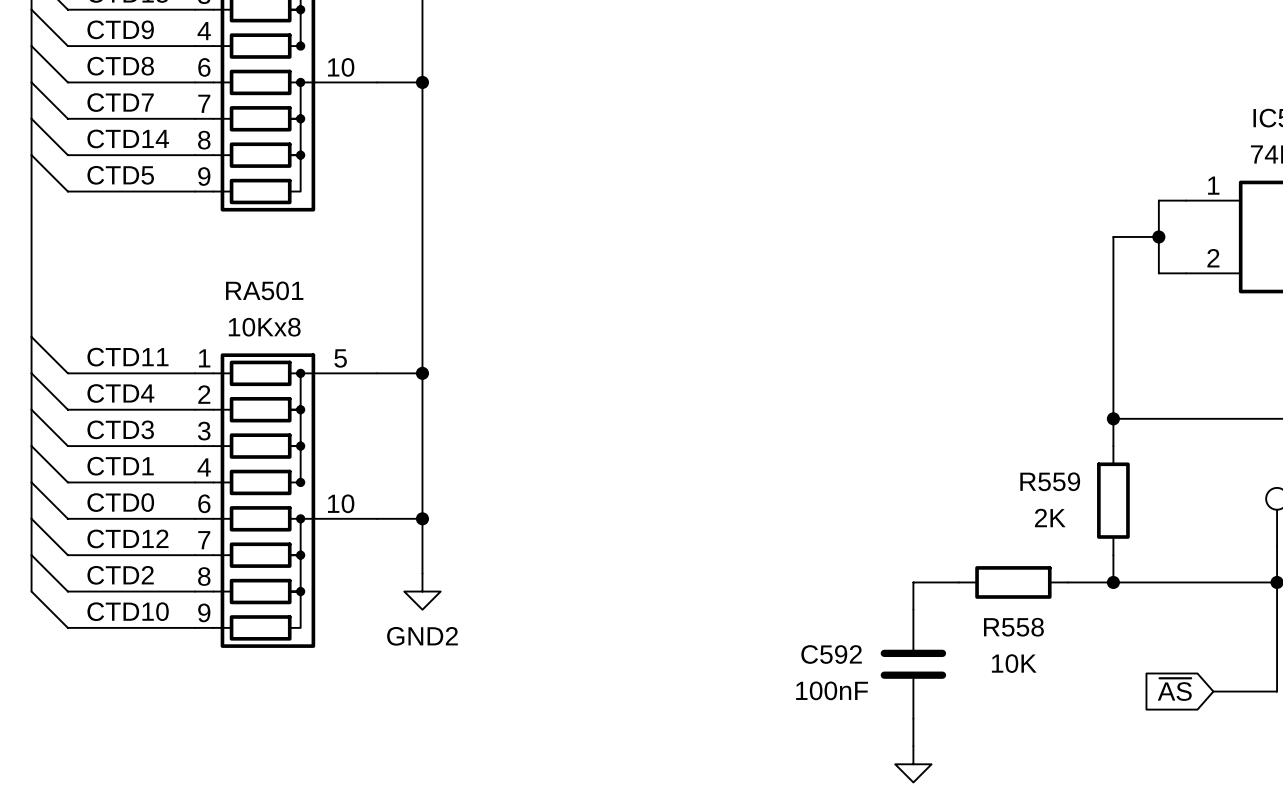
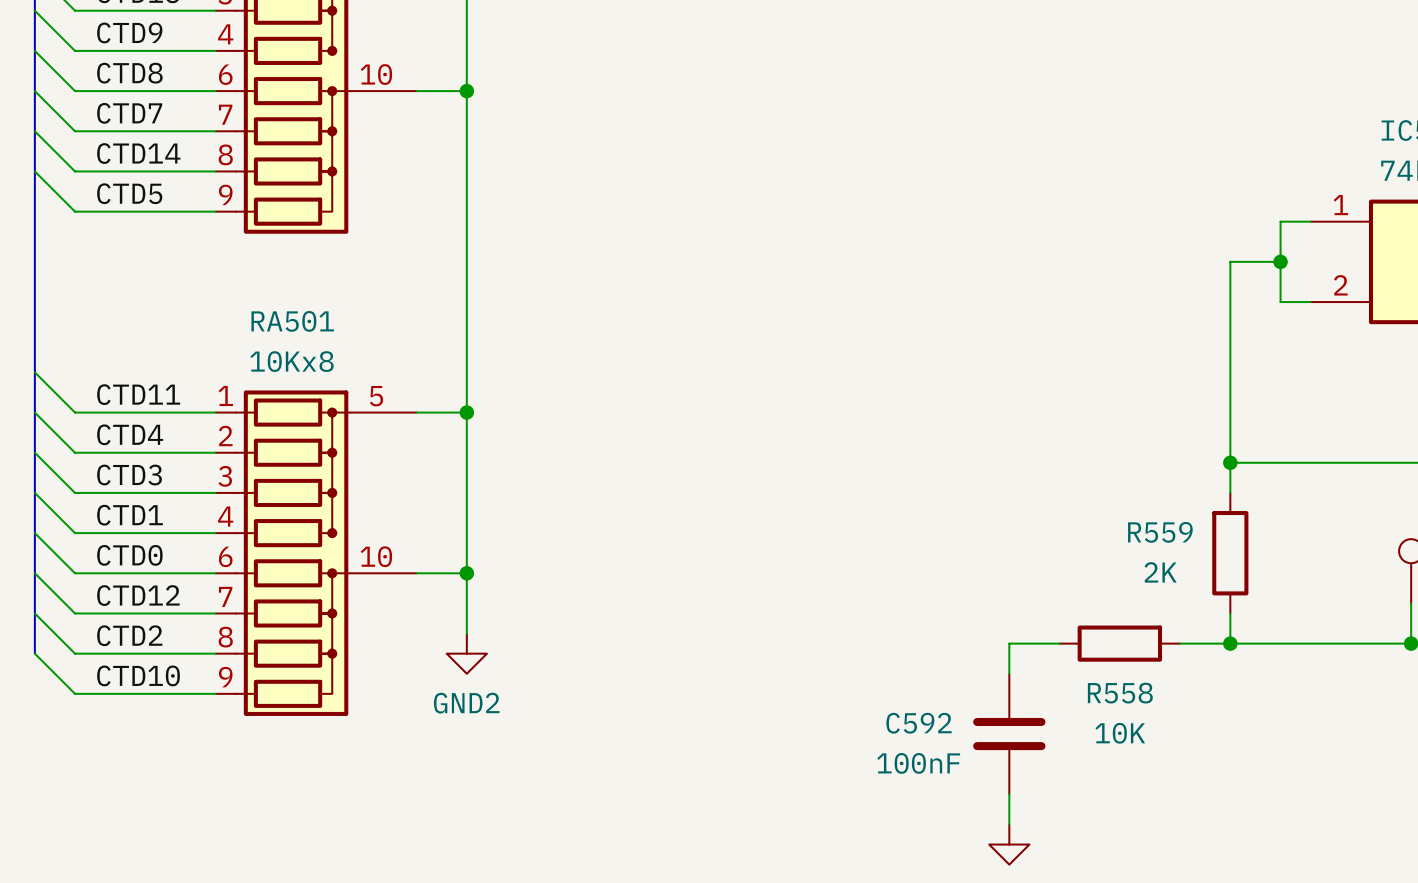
wire: (1277, 582) (1277, 691) (1213, 691) -> none
global label: ~{AS} (1174, 689) -> none

